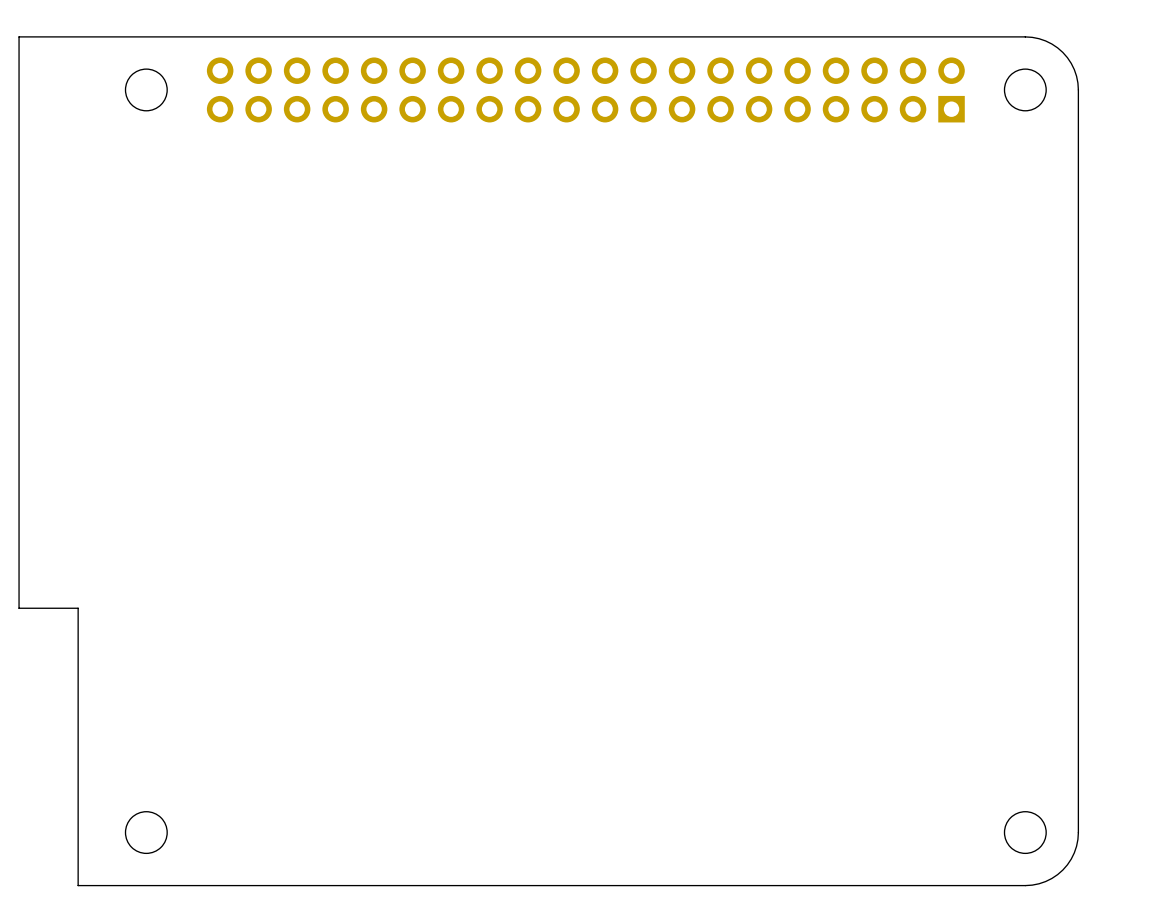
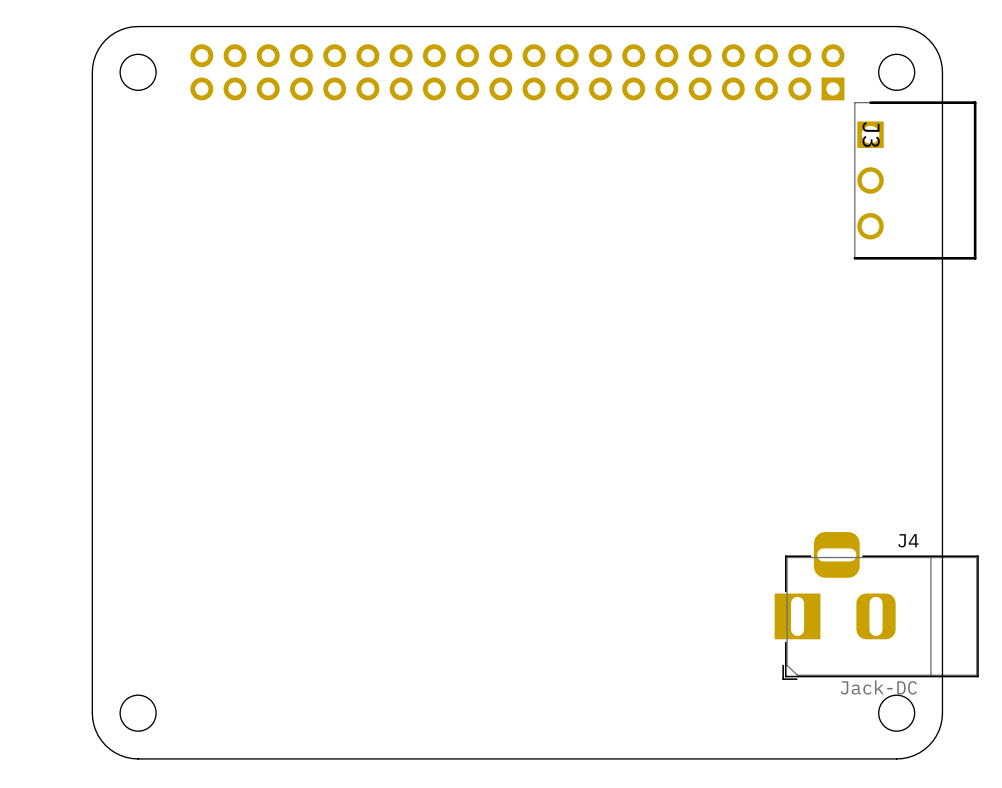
board edge: (146, 36) (19, 36) (19, 608) (78, 608) (78, 885) (146, 885) -> (138, 26) (120, 30) (105, 39) (95, 54) (92, 72) (92, 719) (98, 736) (105, 745) (120, 755) (138, 758)
J3: none -> (914, 180)
J4: none -> Jack-DC (876, 605)

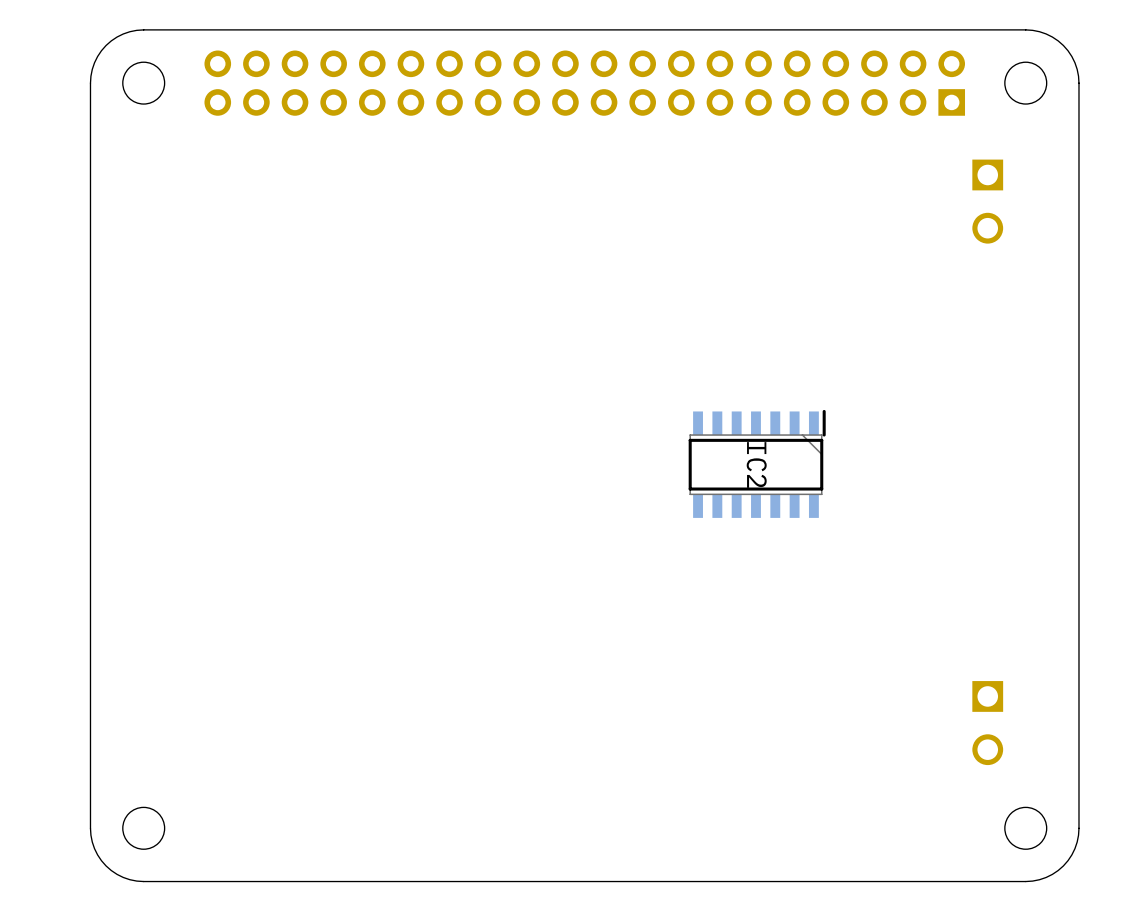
part: none -> (987, 201)
J3: (914, 180) -> none
IC2: none -> (757, 463)
J4: Jack-DC (876, 605) -> none
part: none -> (987, 723)

